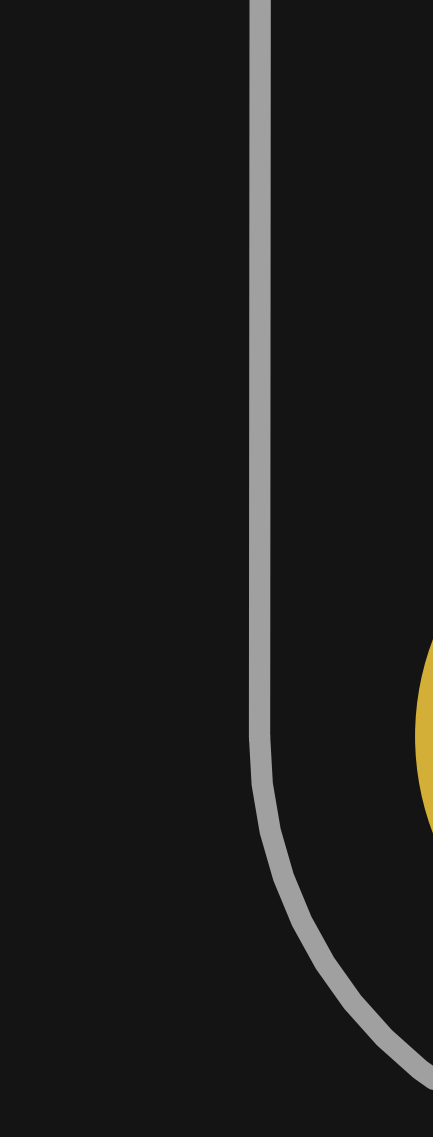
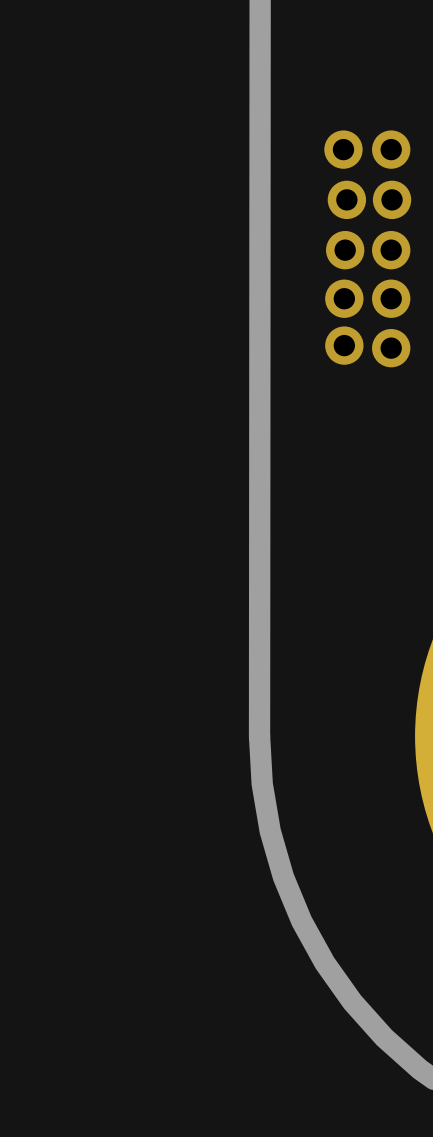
via: none -> (343, 149)
via: none -> (391, 149)
via: none -> (346, 199)
via: none -> (392, 199)
via: none -> (345, 250)
via: none -> (391, 250)
via: none -> (344, 298)
via: none -> (391, 298)
via: none -> (344, 345)
via: none -> (391, 348)

